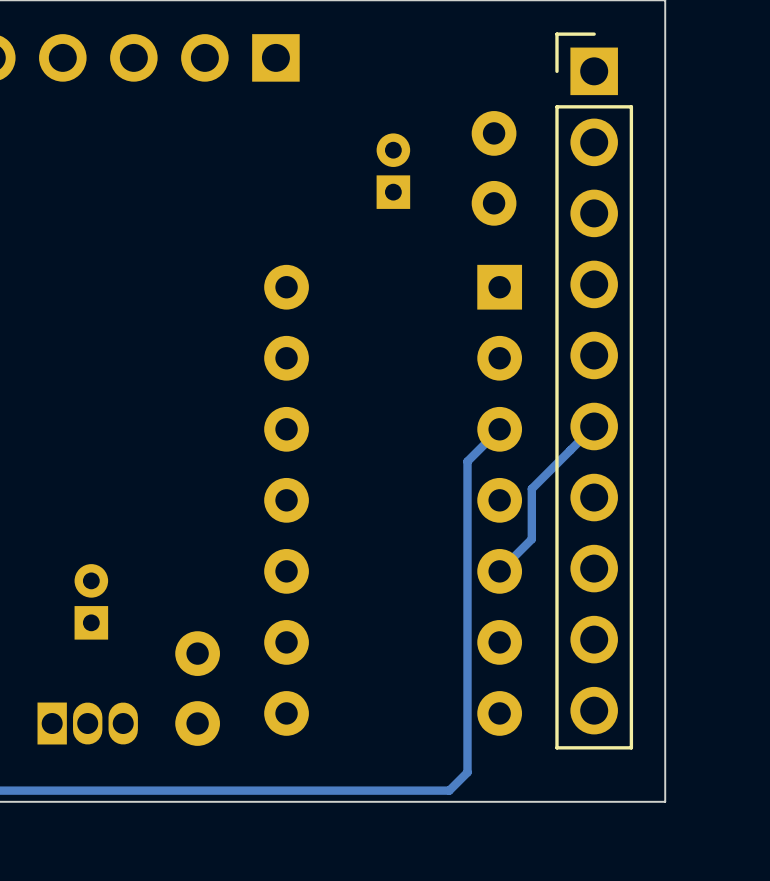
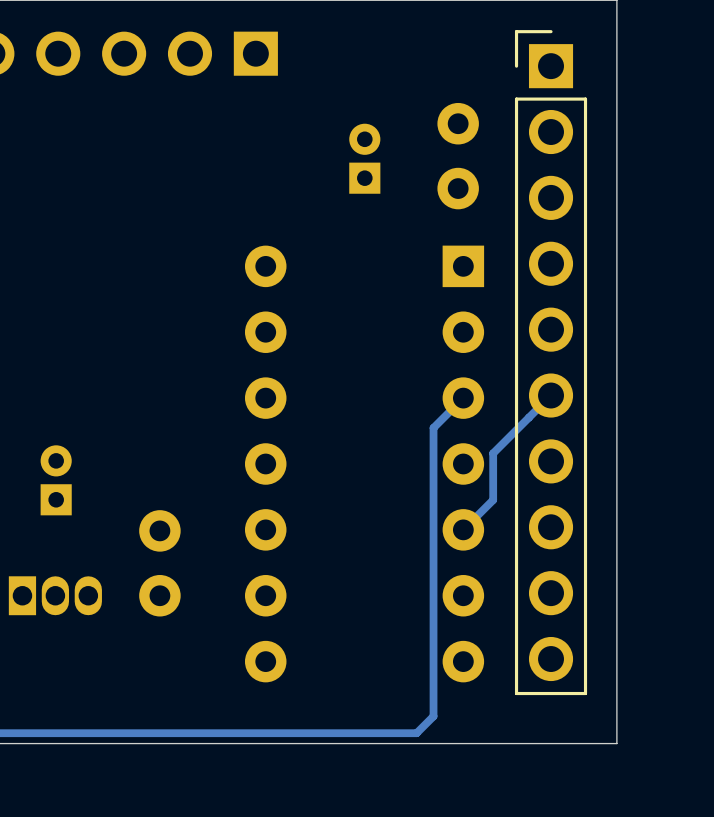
part position: (91, 601) -> (56, 480)
part position: (197, 688) -> (159, 563)
part position: (87, 723) -> (55, 595)

